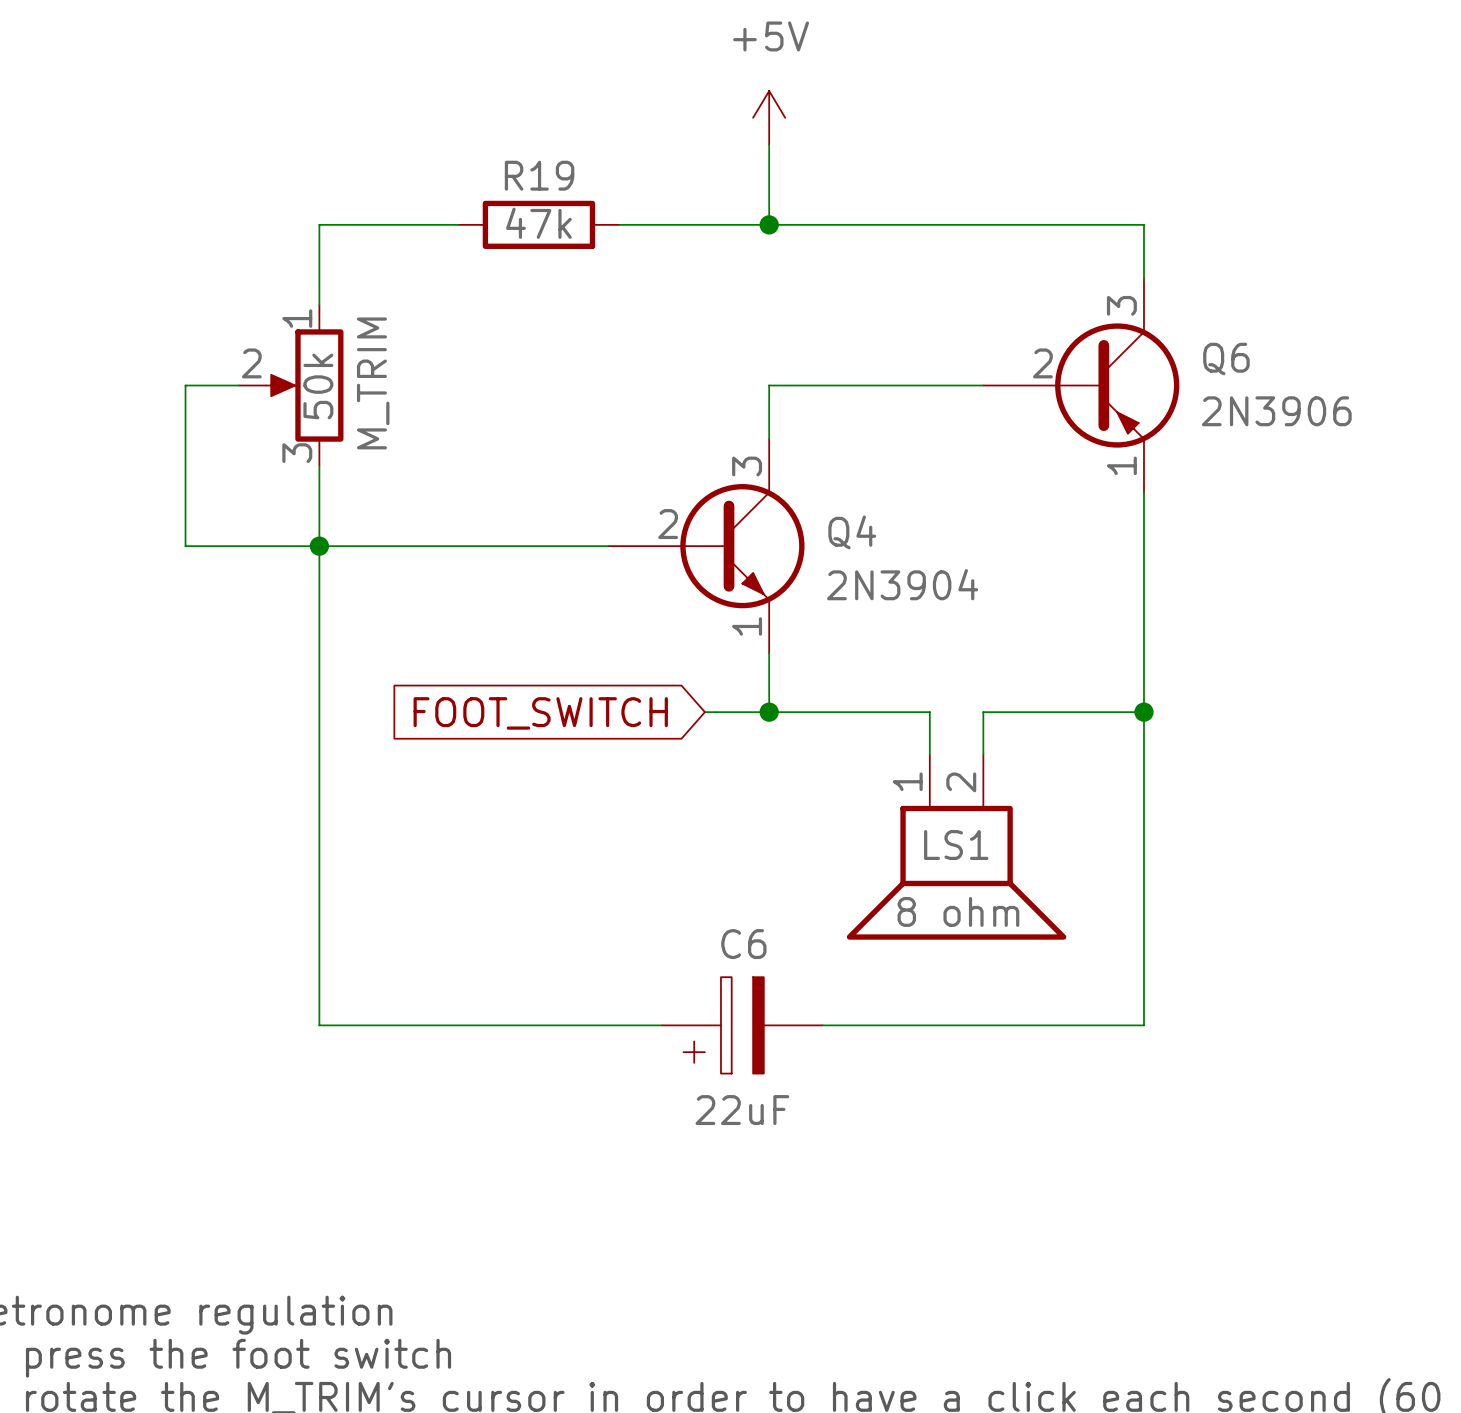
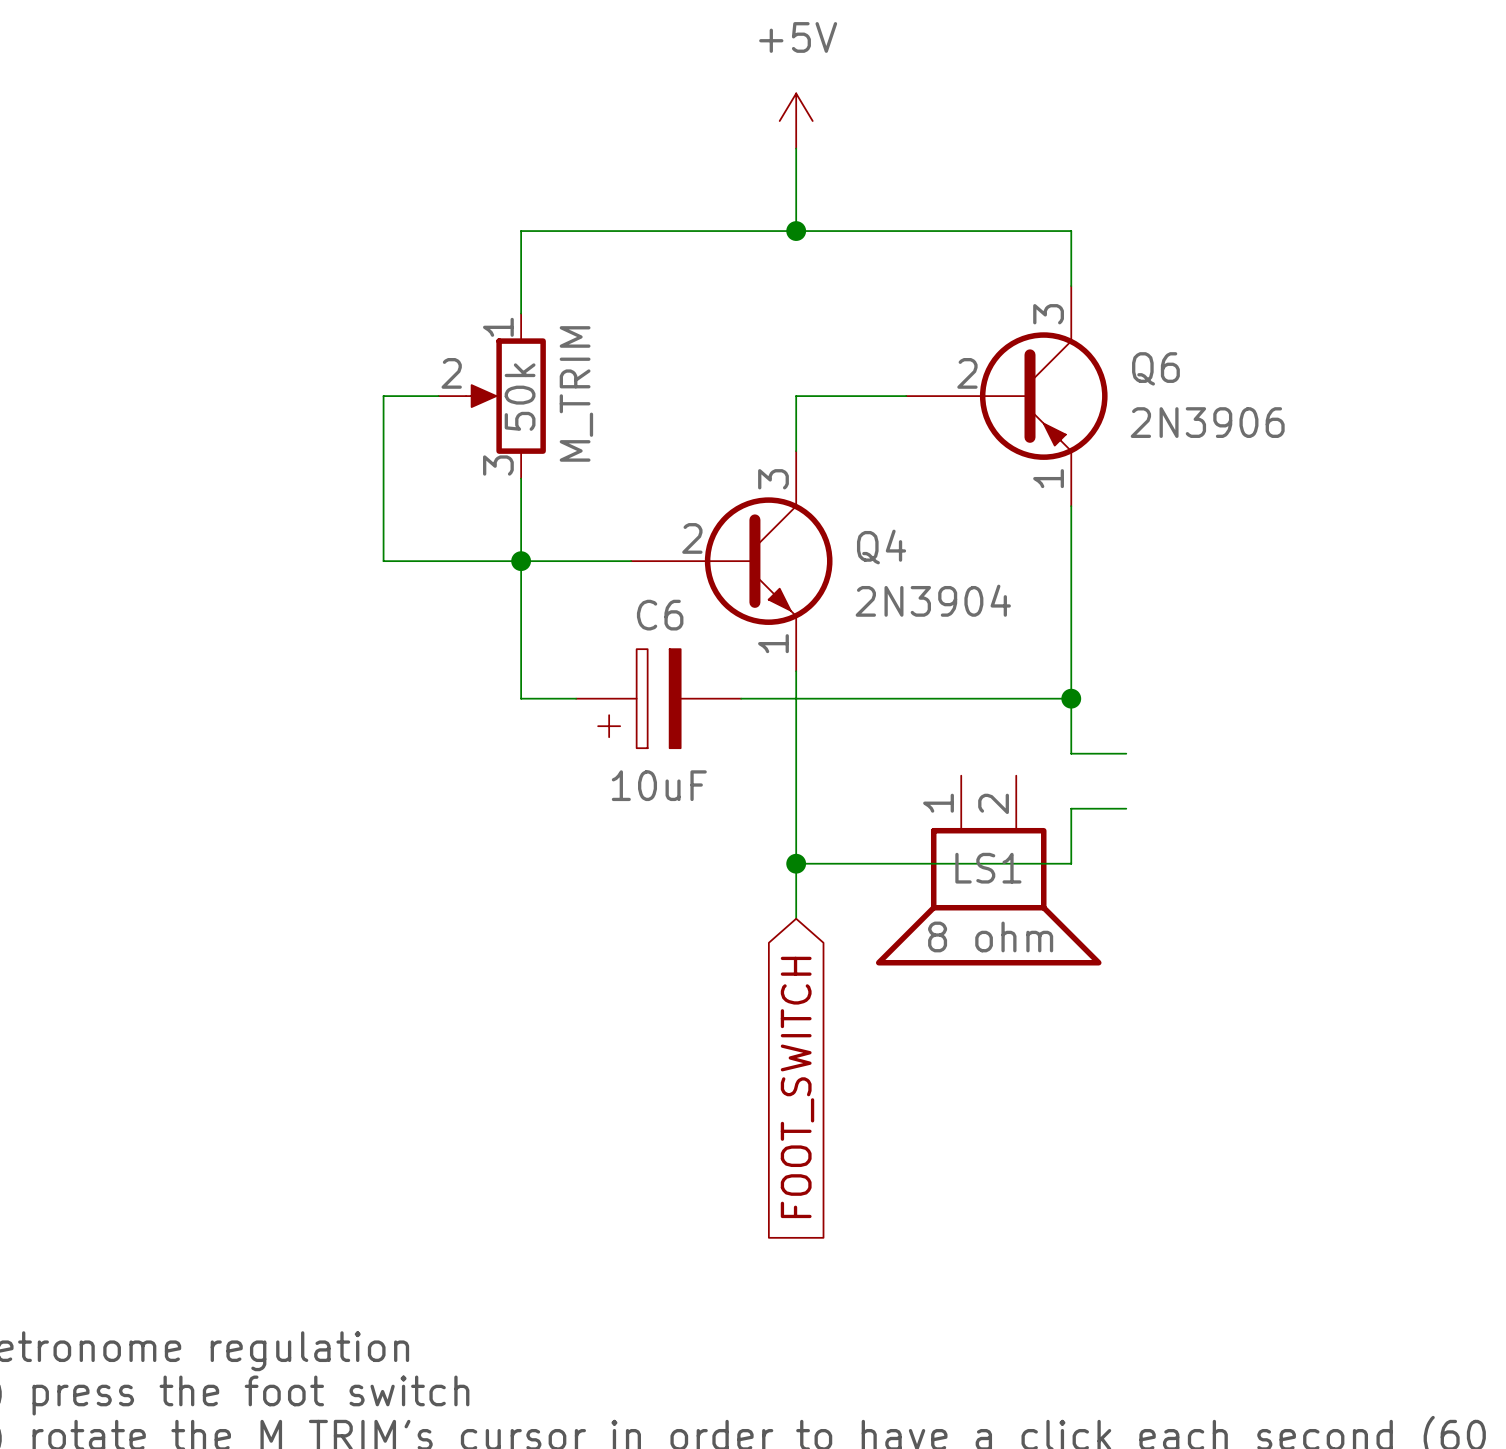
wire: (458, 224) (319, 224) (319, 305) -> none
R19: 47k (538, 224) -> none
wire: none -> (642, 231) (521, 231) (521, 313)
wire: (1036, 224) (1143, 224) (1143, 278) -> (1071, 231) (1071, 286)
wire: (239, 385) (185, 385) (185, 546) (367, 546) -> (438, 396) (383, 396) (383, 561)
M_TRIM position: (291, 385) -> (492, 396)
Q6 position: (1081, 385) -> (1006, 396)
wire: (319, 465) (319, 1025) (662, 1025) -> none
wire: none -> (521, 478) (521, 698) (576, 698)
wire: none -> (1071, 506) (1071, 753) (1126, 753)
wire: (1143, 492) (1143, 1025) (822, 1025) -> none
junction: (319, 546) -> none
junction: none -> (521, 561)
wire: none -> (741, 698) (1071, 698)
wire: (704, 712) (929, 712) (929, 754) -> none
wire: none -> (796, 731) (796, 918)
junction: (769, 712) -> none
wire: (1143, 712) (983, 712) (983, 754) -> none
junction position: (1143, 712) -> (1071, 698)
global label rotation: 0° (540, 713) -> 90° counterclockwise (797, 1087)
global label position: FOOT_SWITCH (540, 713) -> FOOT_SWITCH (797, 1087)
wire: none -> (1126, 808) (1071, 808) (1071, 863) (796, 863)
junction: none -> (796, 863)
C6 position: (742, 1025) -> (658, 698)
C6 value: 22uF (742, 1110) -> 10uF (659, 785)

